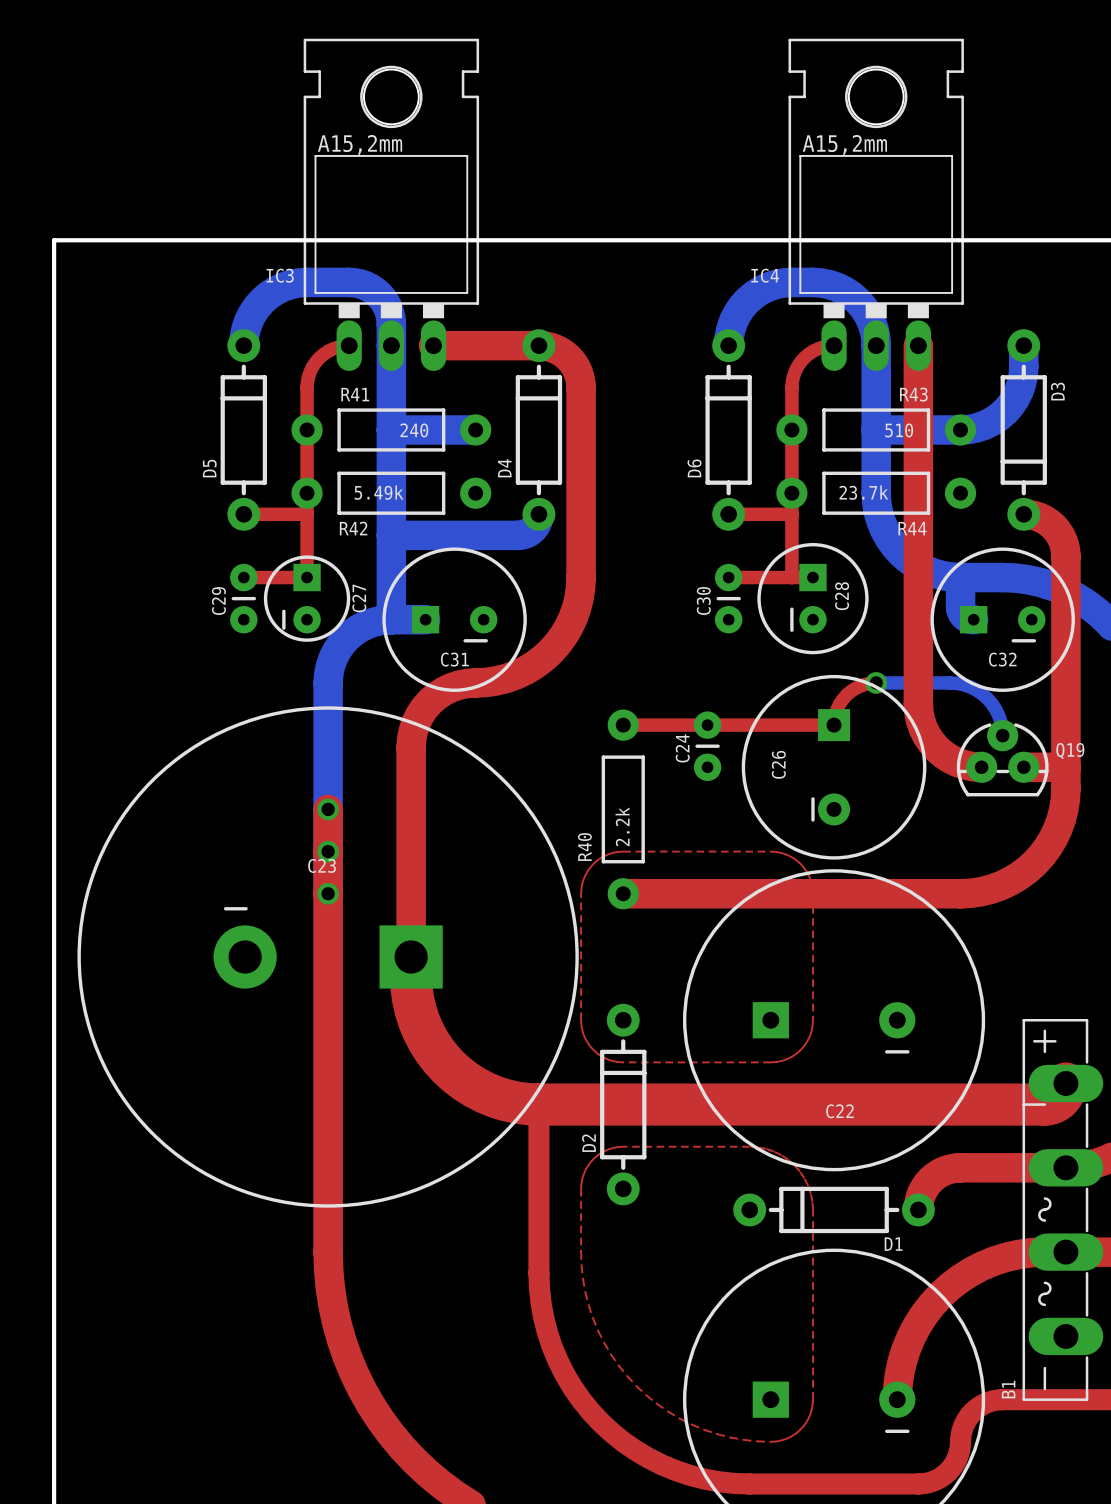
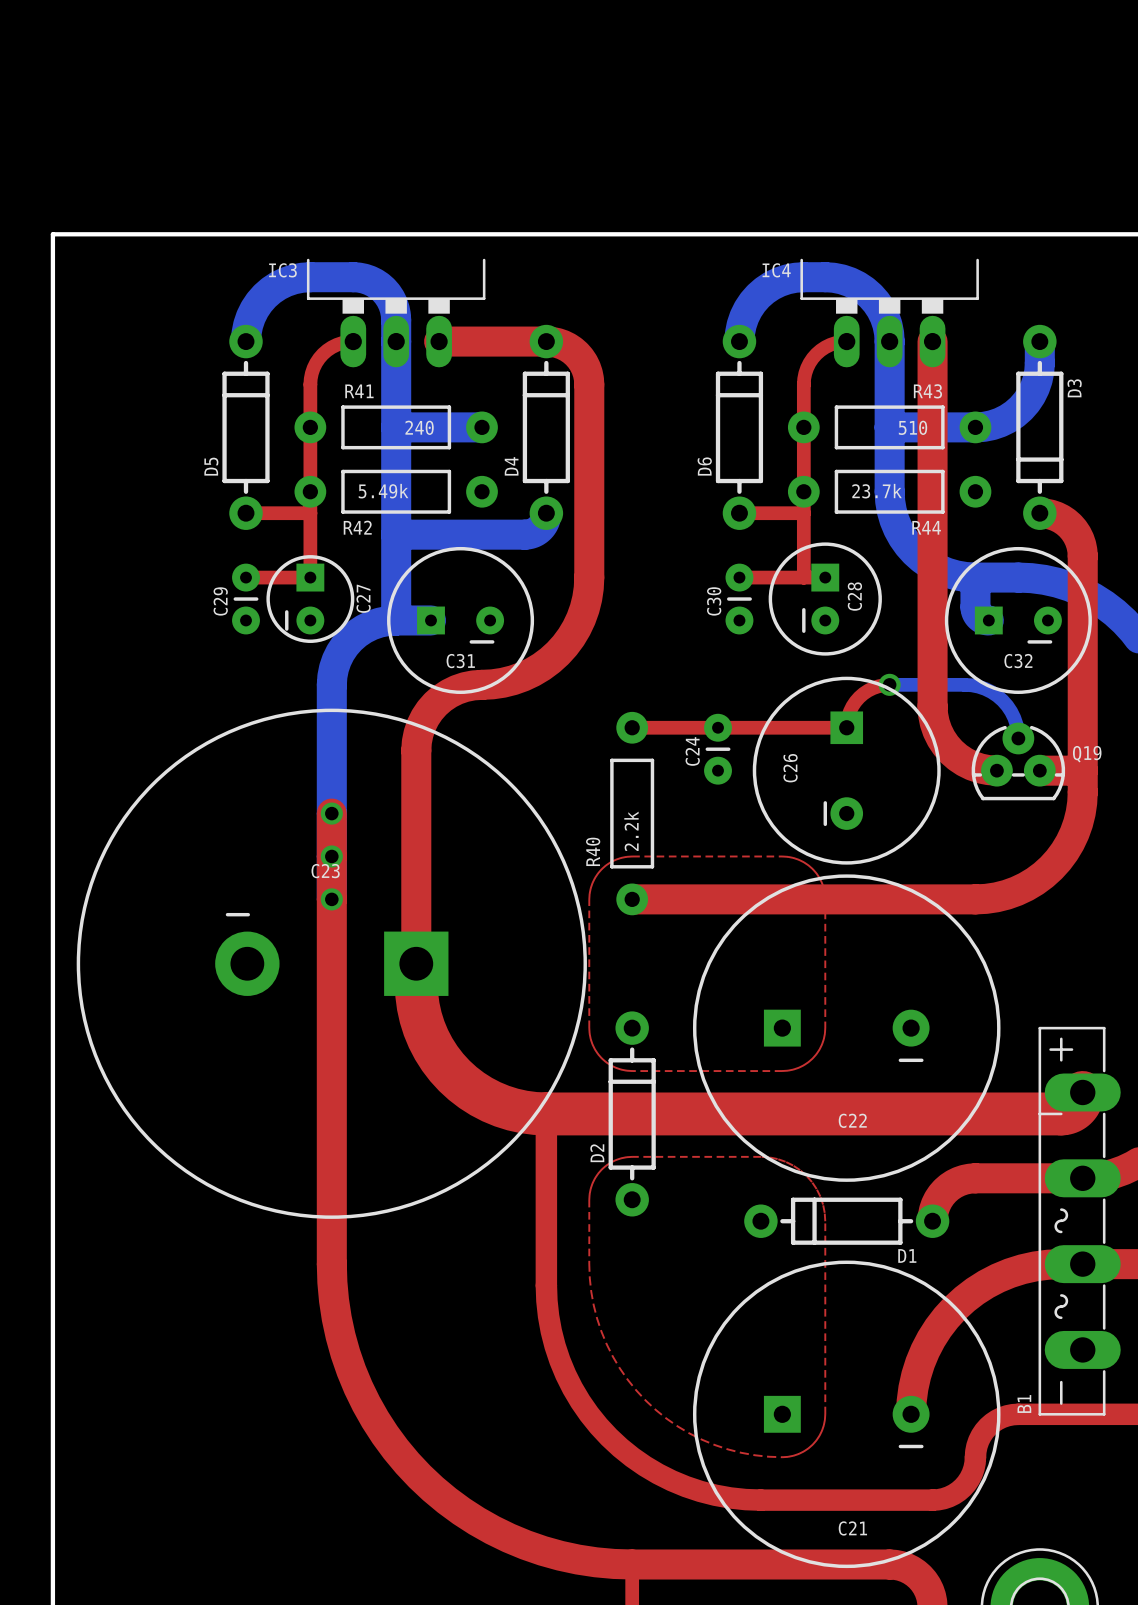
IC3 footprint: [303, 38, 480, 371] -> [306, 258, 486, 368]
IC4 footprint: [788, 38, 964, 371] -> [800, 258, 979, 368]

